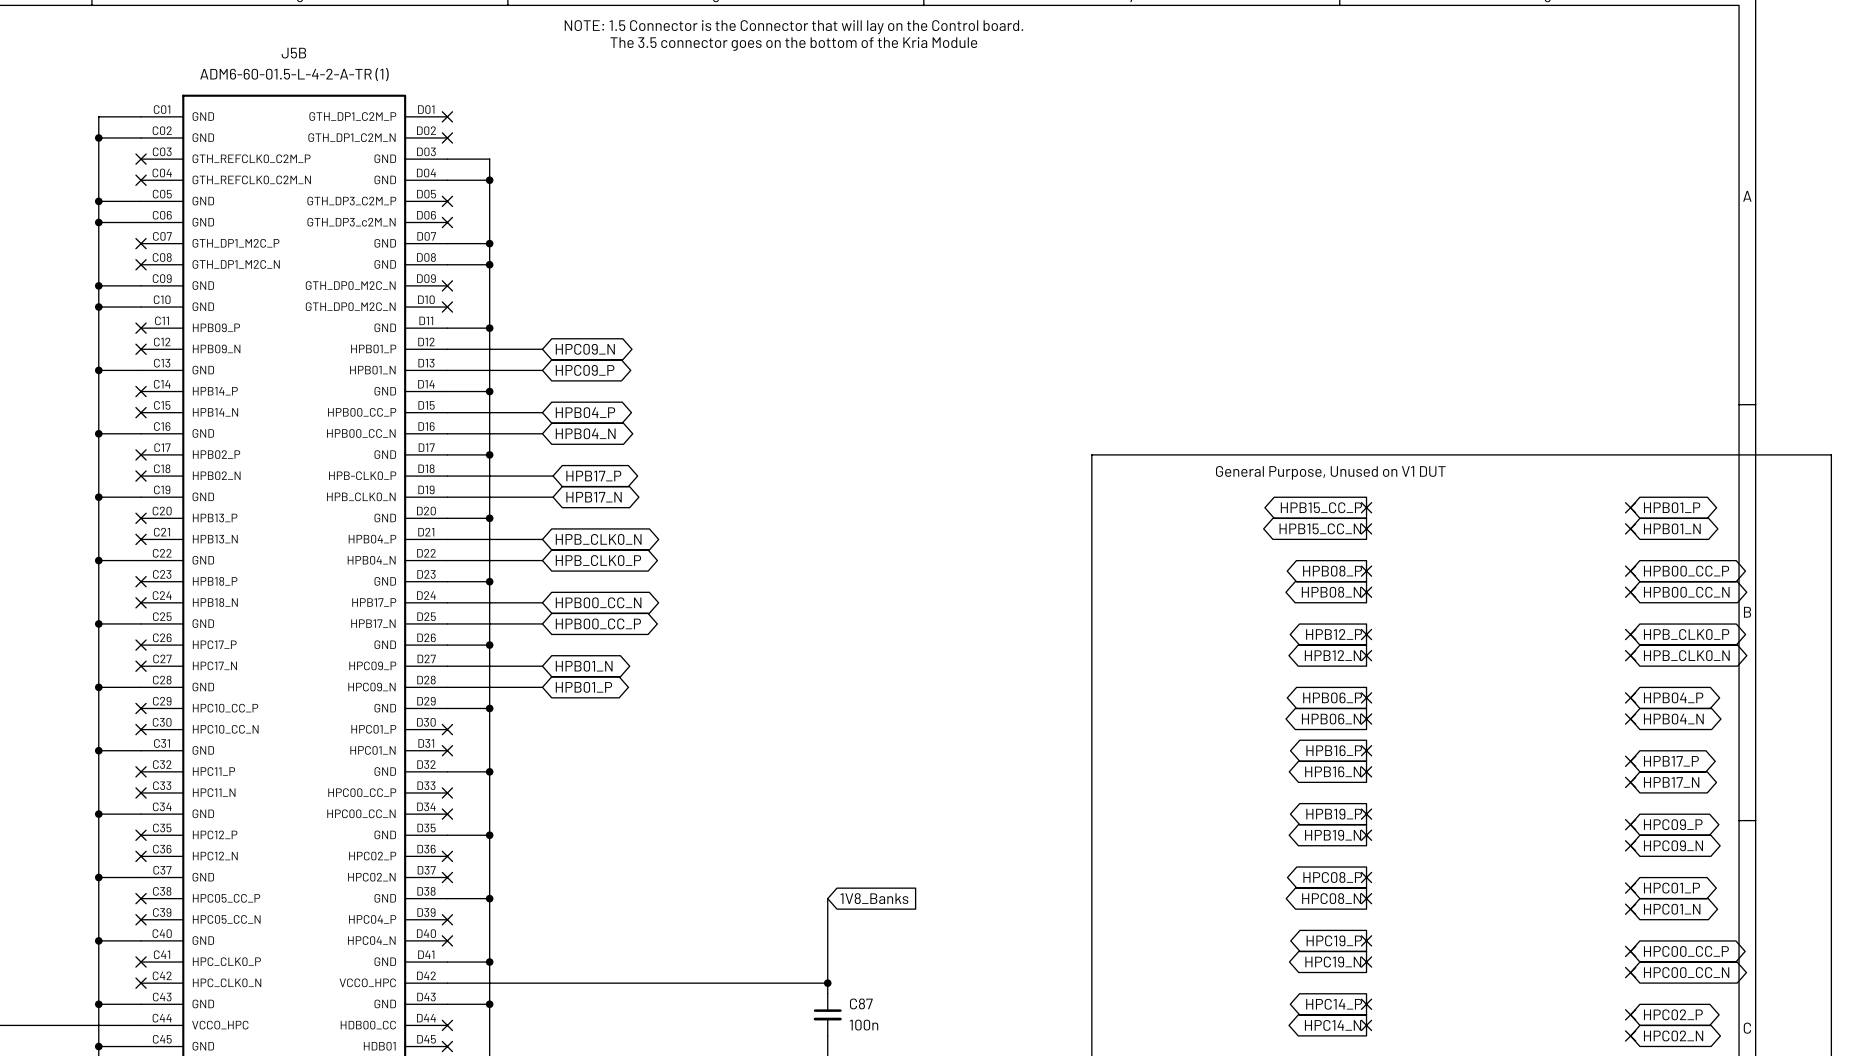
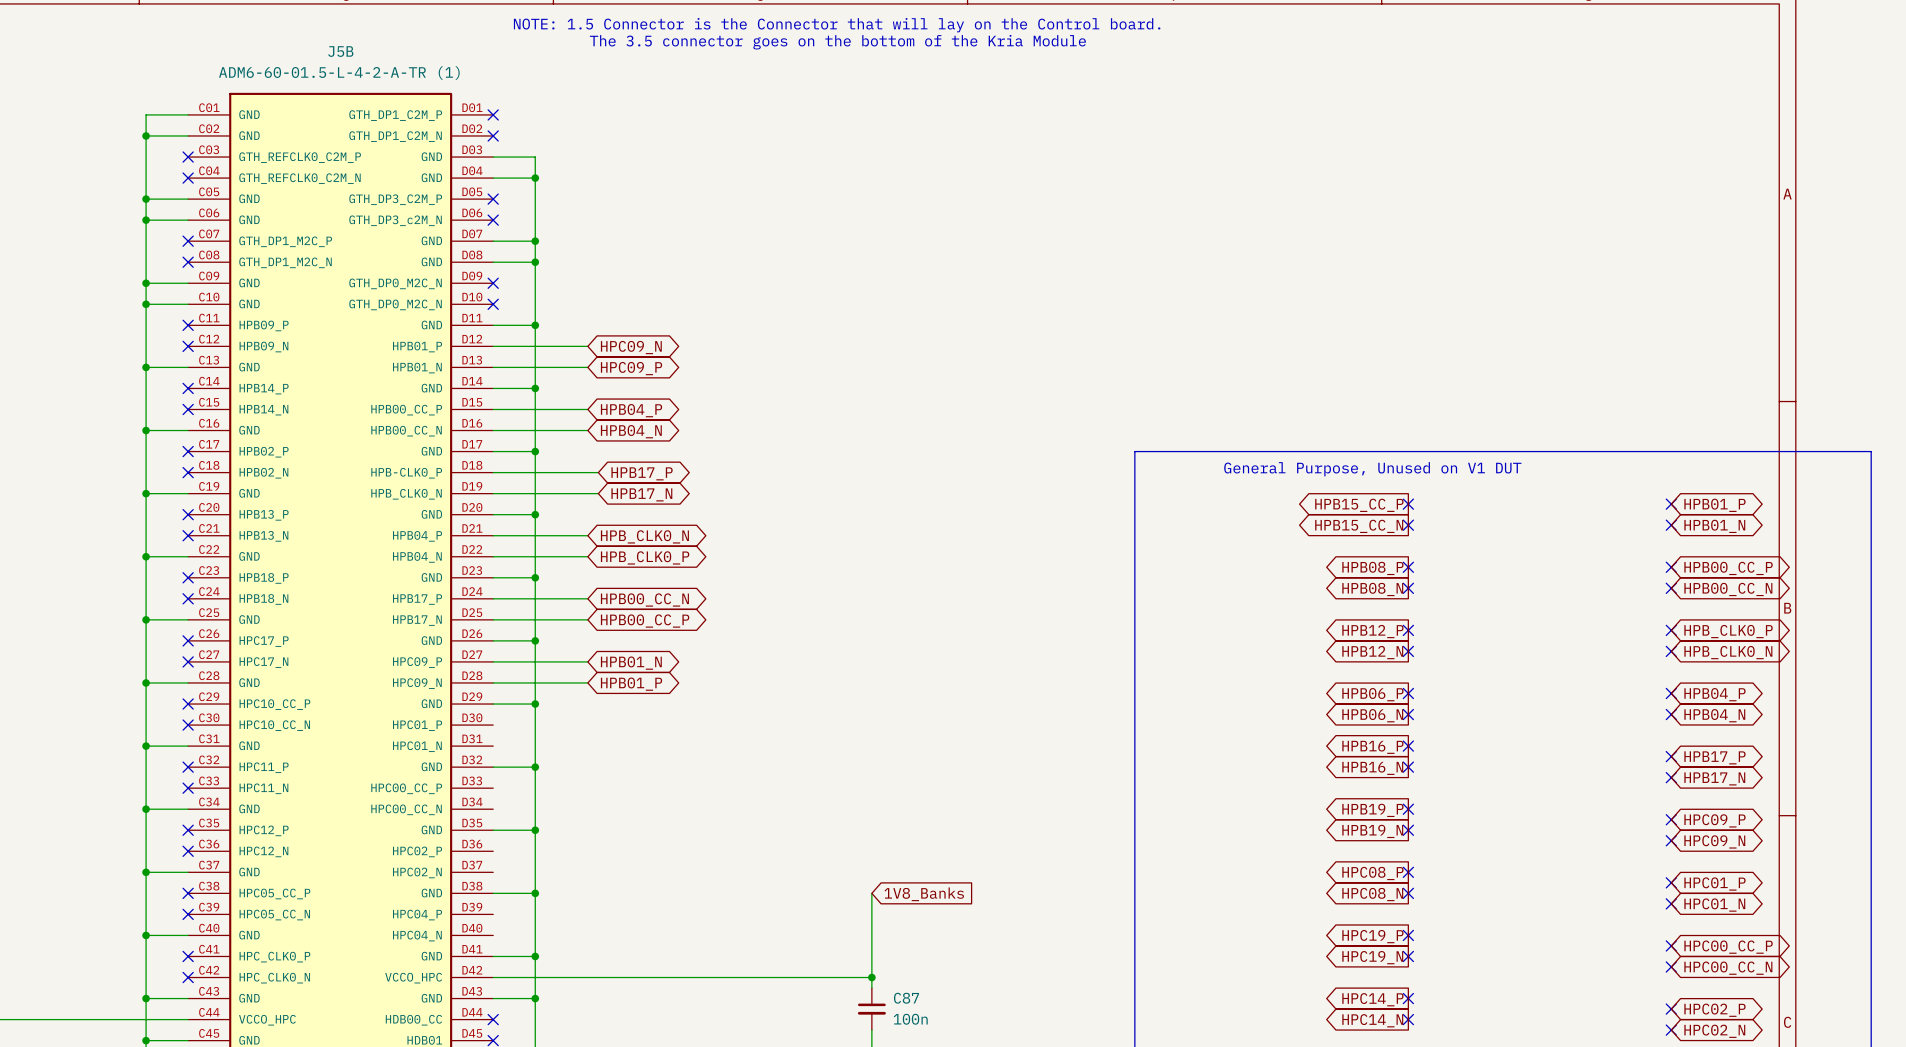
no-connect mark: (447, 729) -> none
no-connect mark: (447, 750) -> none
no-connect mark: (447, 792) -> none
no-connect mark: (447, 814) -> none
no-connect mark: (447, 856) -> none
no-connect mark: (447, 877) -> none
no-connect mark: (447, 919) -> none
no-connect mark: (447, 940) -> none

